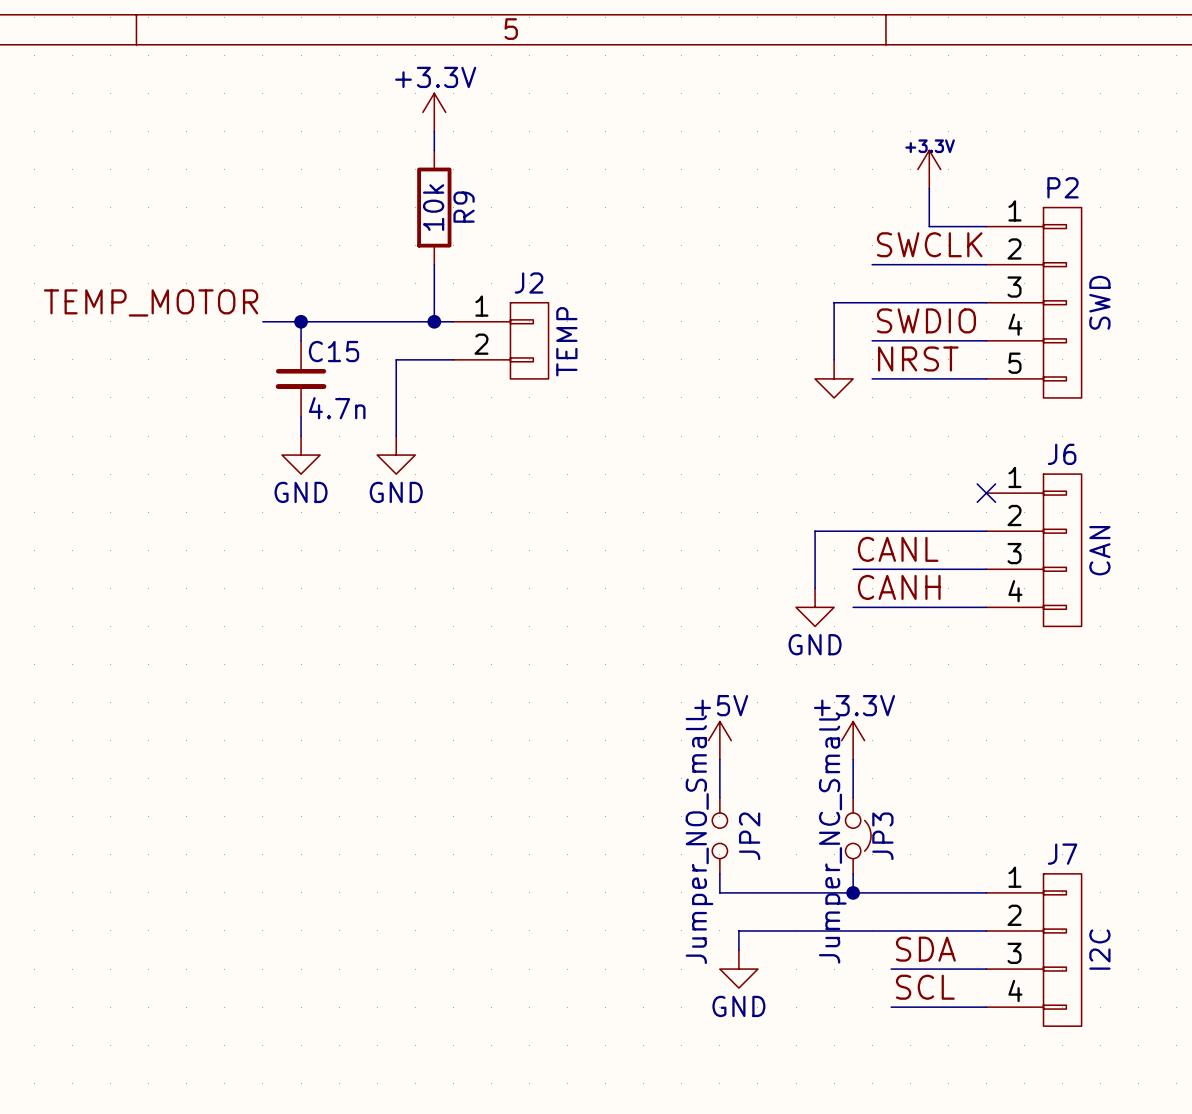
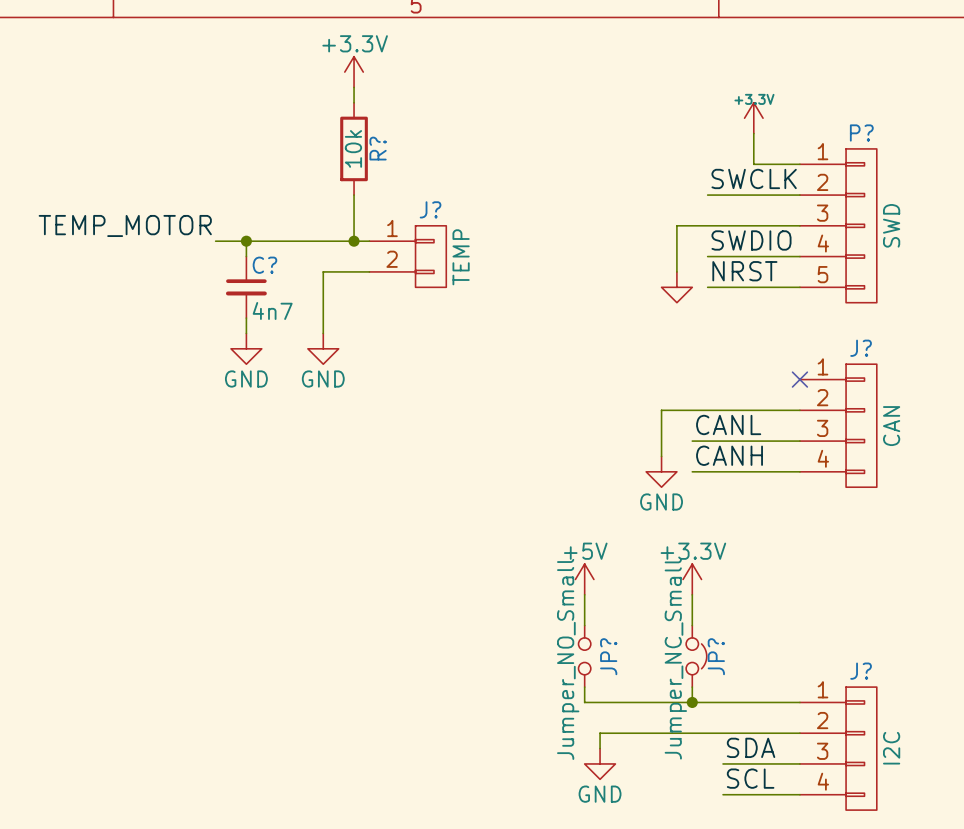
P2 name: P2 (1063, 187) -> P? (861, 132)
R9 name: R9 (464, 207) -> R? (378, 148)
J2 name: J2 (529, 283) -> J? (430, 209)
C15 name: C15 (334, 351) -> C? (264, 265)
C15 value: 4.7n (337, 408) -> 4n7 (272, 310)
J6 name: J6 (1062, 454) -> J? (861, 348)
JP2 name: JP2 (749, 836) -> JP? (608, 656)
JP3 name: JP3 (882, 836) -> JP? (716, 656)
J7 name: J7 (1062, 854) -> J? (861, 671)

